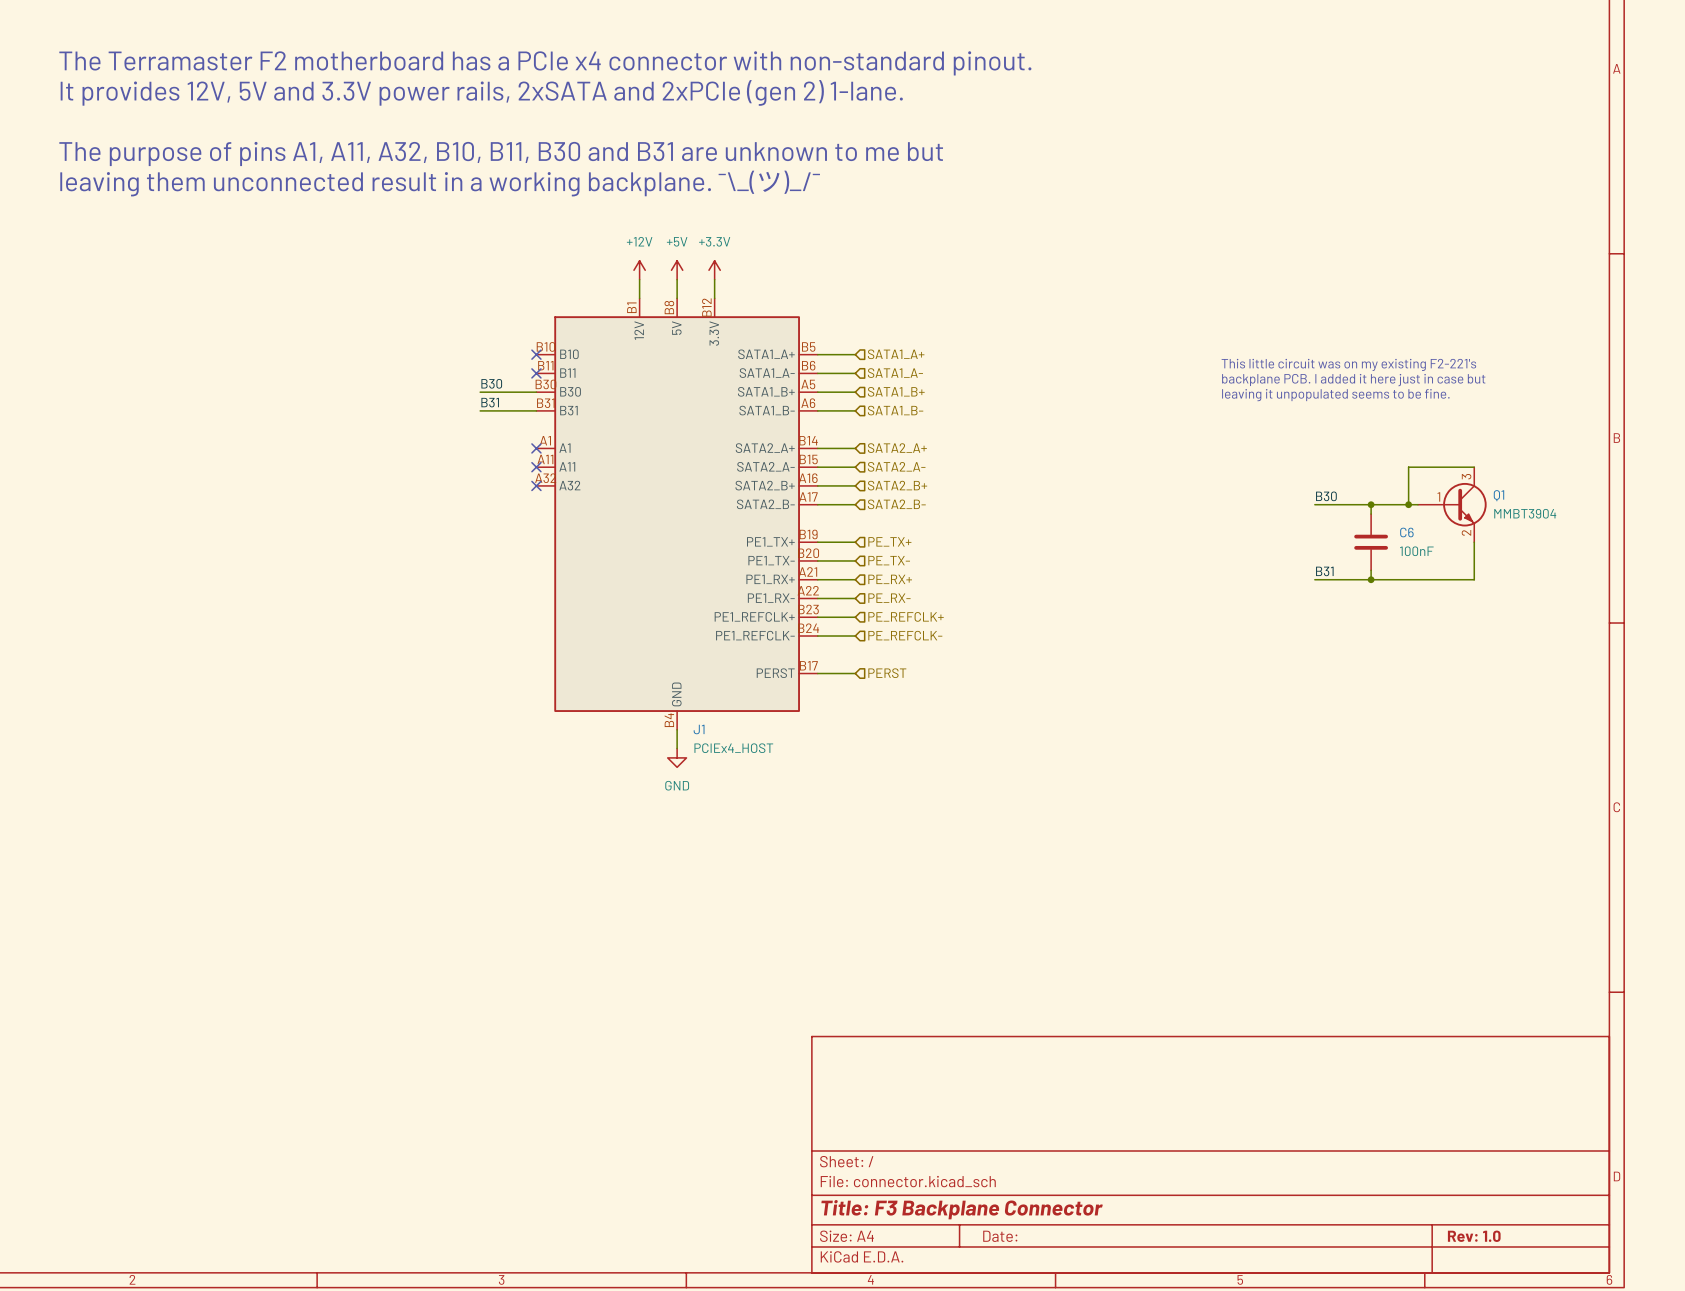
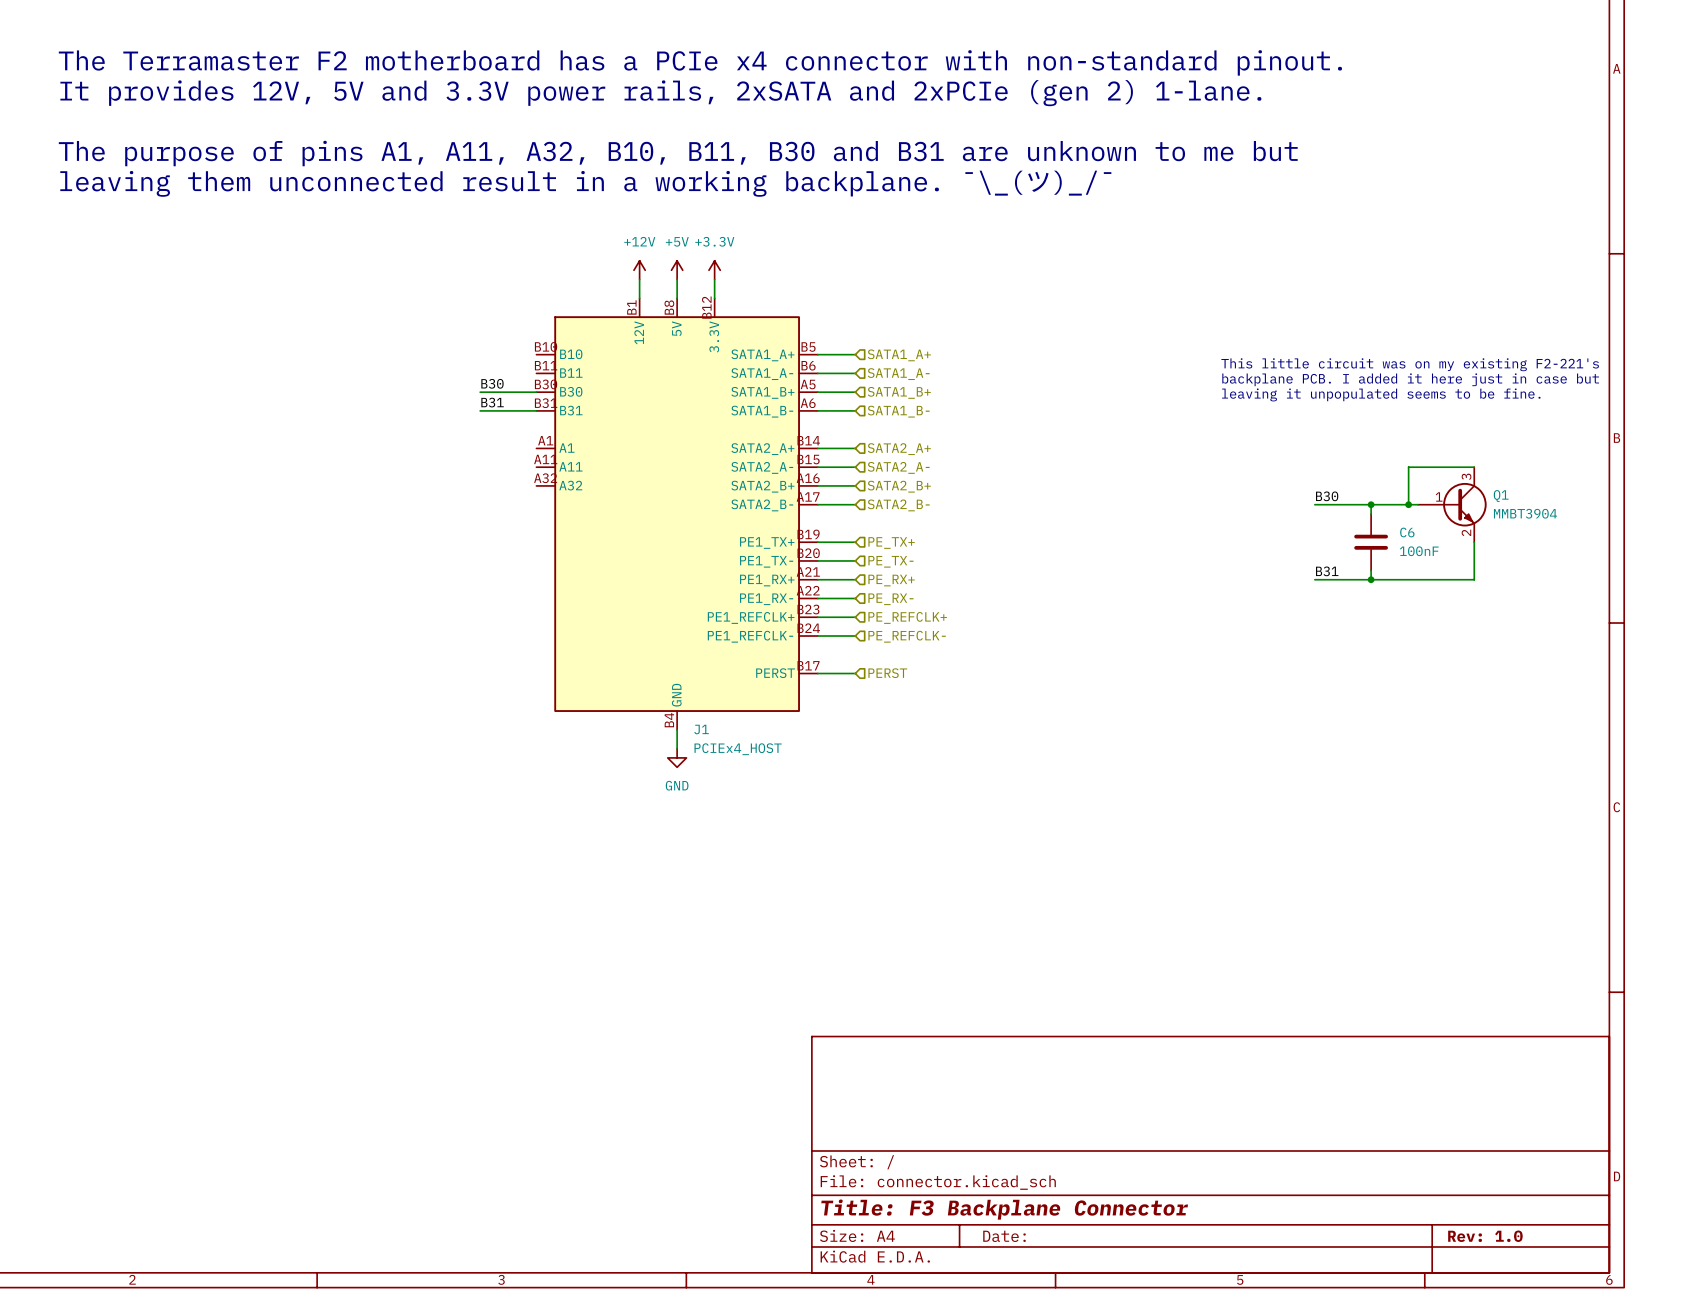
no-connect mark: (536, 354) -> none
no-connect mark: (536, 373) -> none
no-connect mark: (536, 448) -> none
no-connect mark: (536, 467) -> none
no-connect mark: (536, 485) -> none

